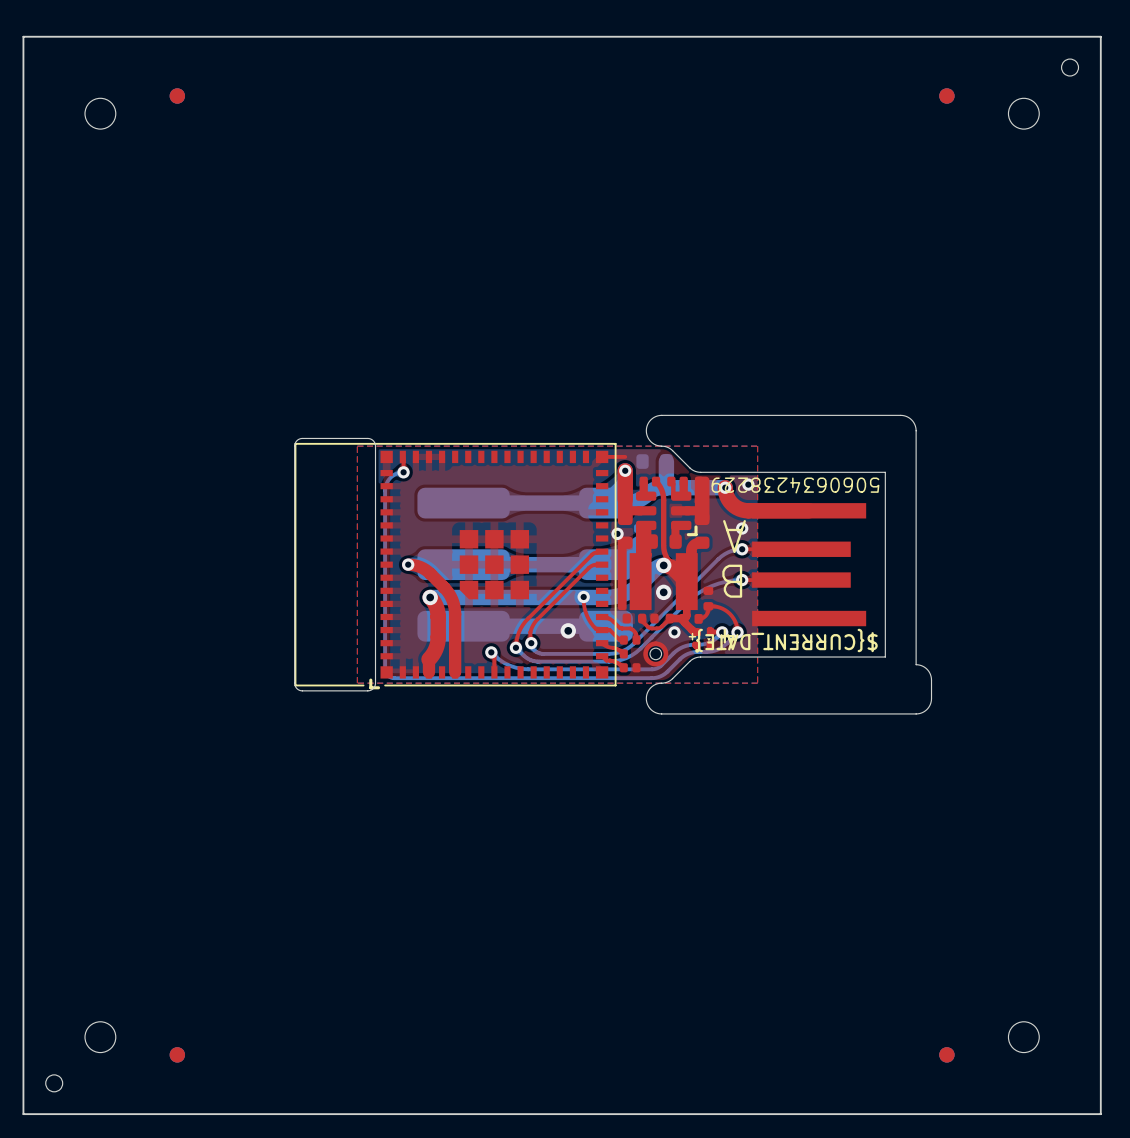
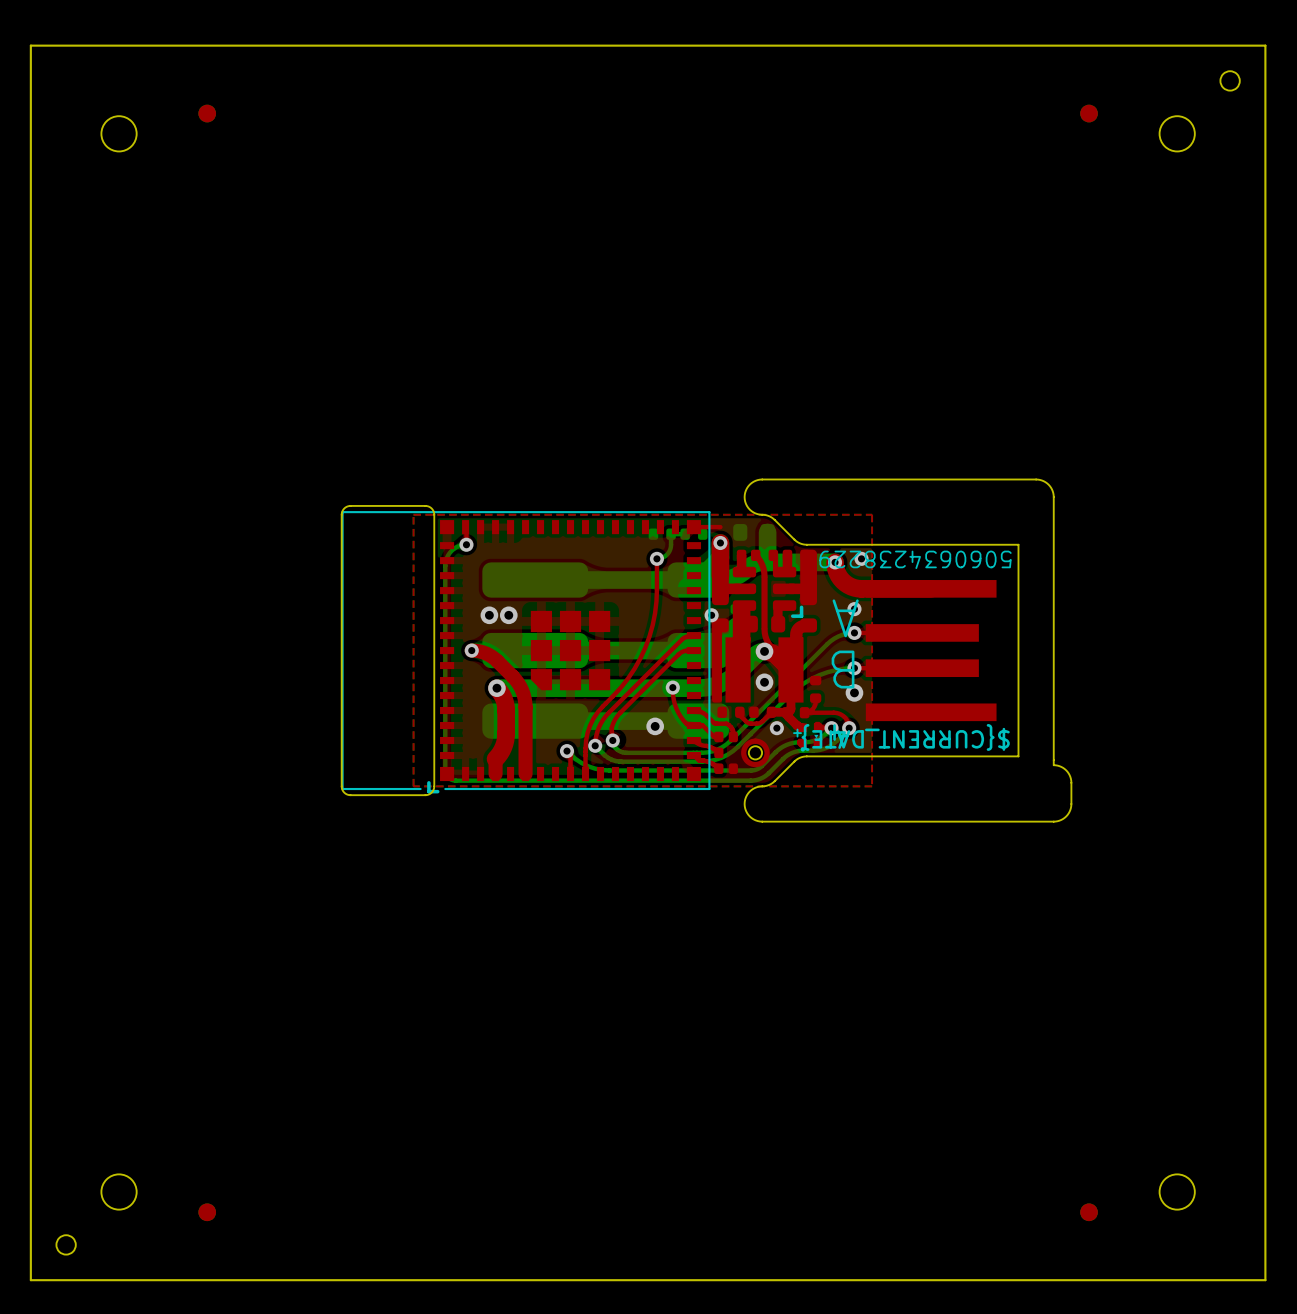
part: none -> (662, 534)
bottom track: none -> (685, 534) (671, 534) (669, 551) (663, 556) (656, 558)
part: none -> (693, 534)
top track: none -> (656, 558) (656, 601) (649, 636) (634, 668) (620, 687) (597, 712) (590, 725) (586, 740) (585, 774)
via: none -> (656, 558)
via: none -> (489, 615)
via: none -> (508, 615)
via: none -> (854, 692)
top track: (708, 606) (720, 607) (729, 613) (736, 623) (737, 632) -> (804, 712) (838, 713) (845, 718) (849, 728)

